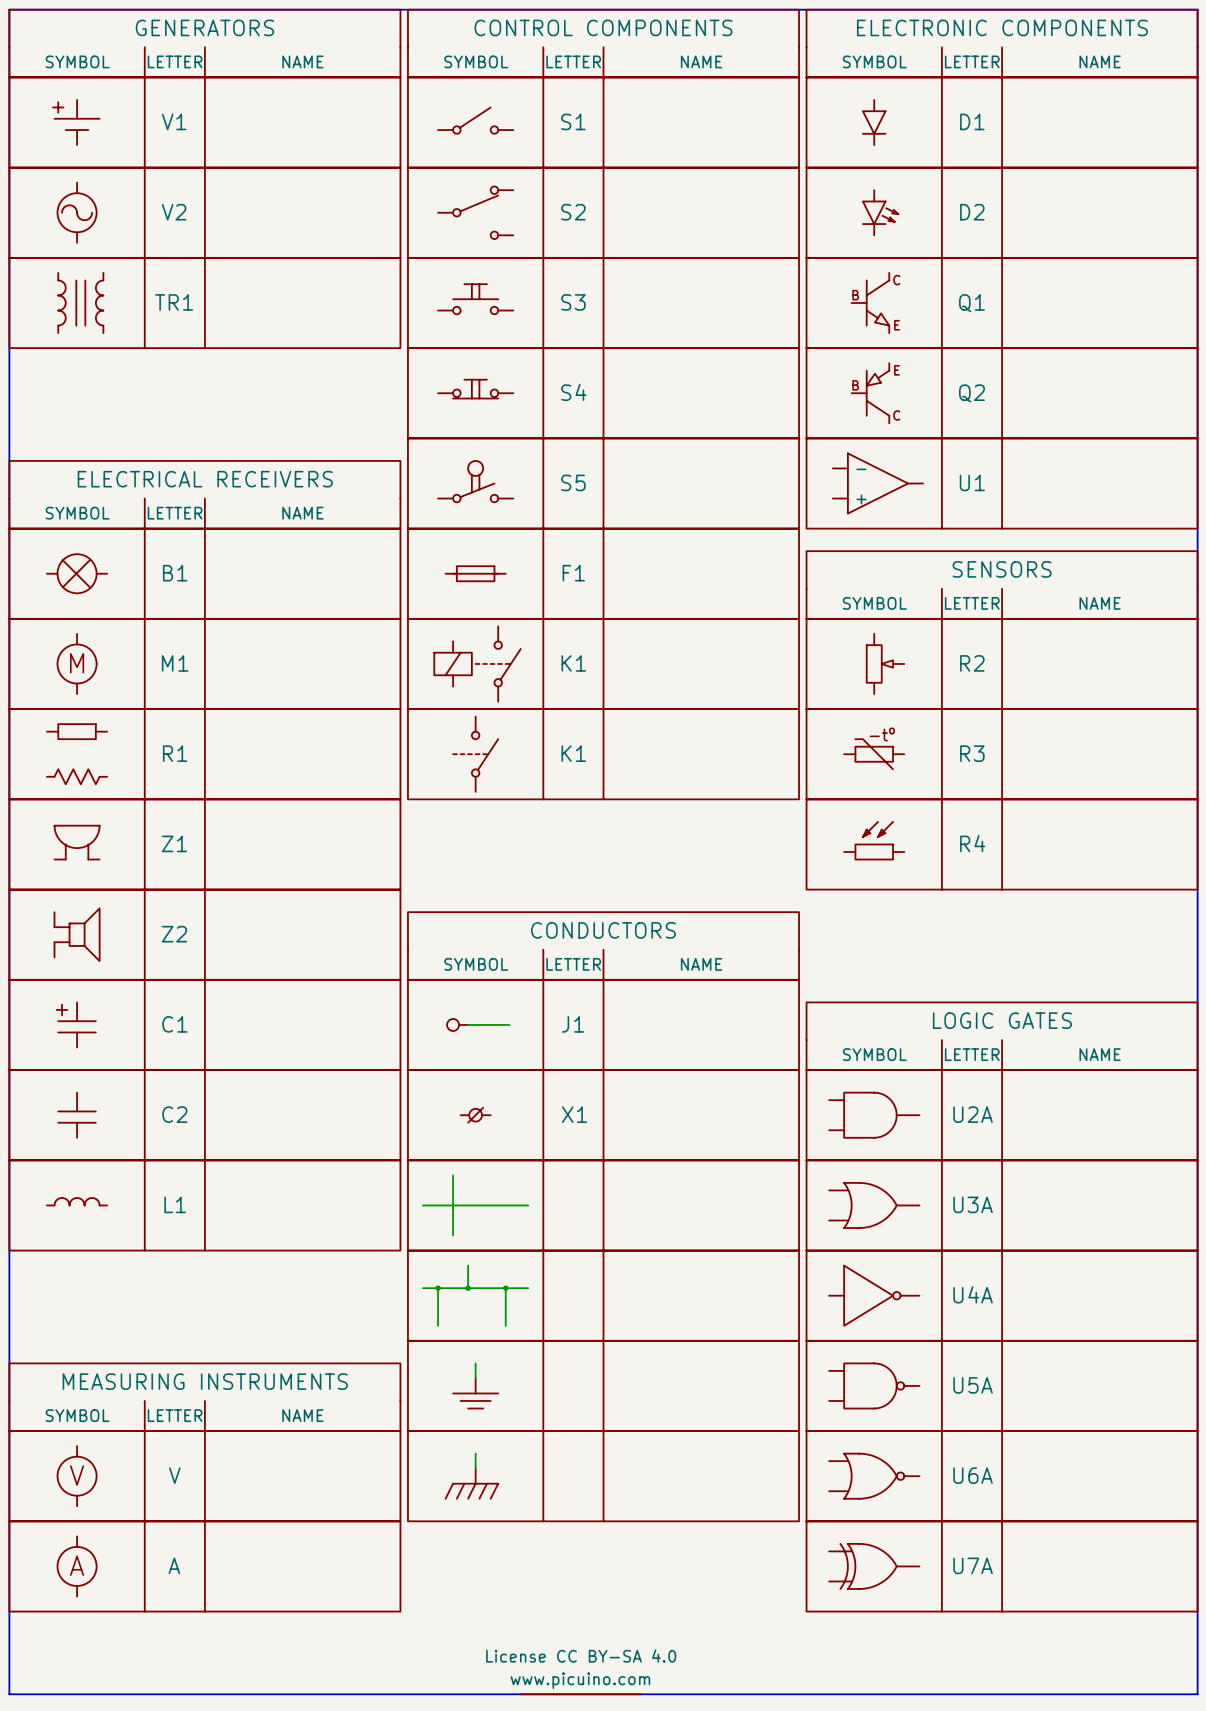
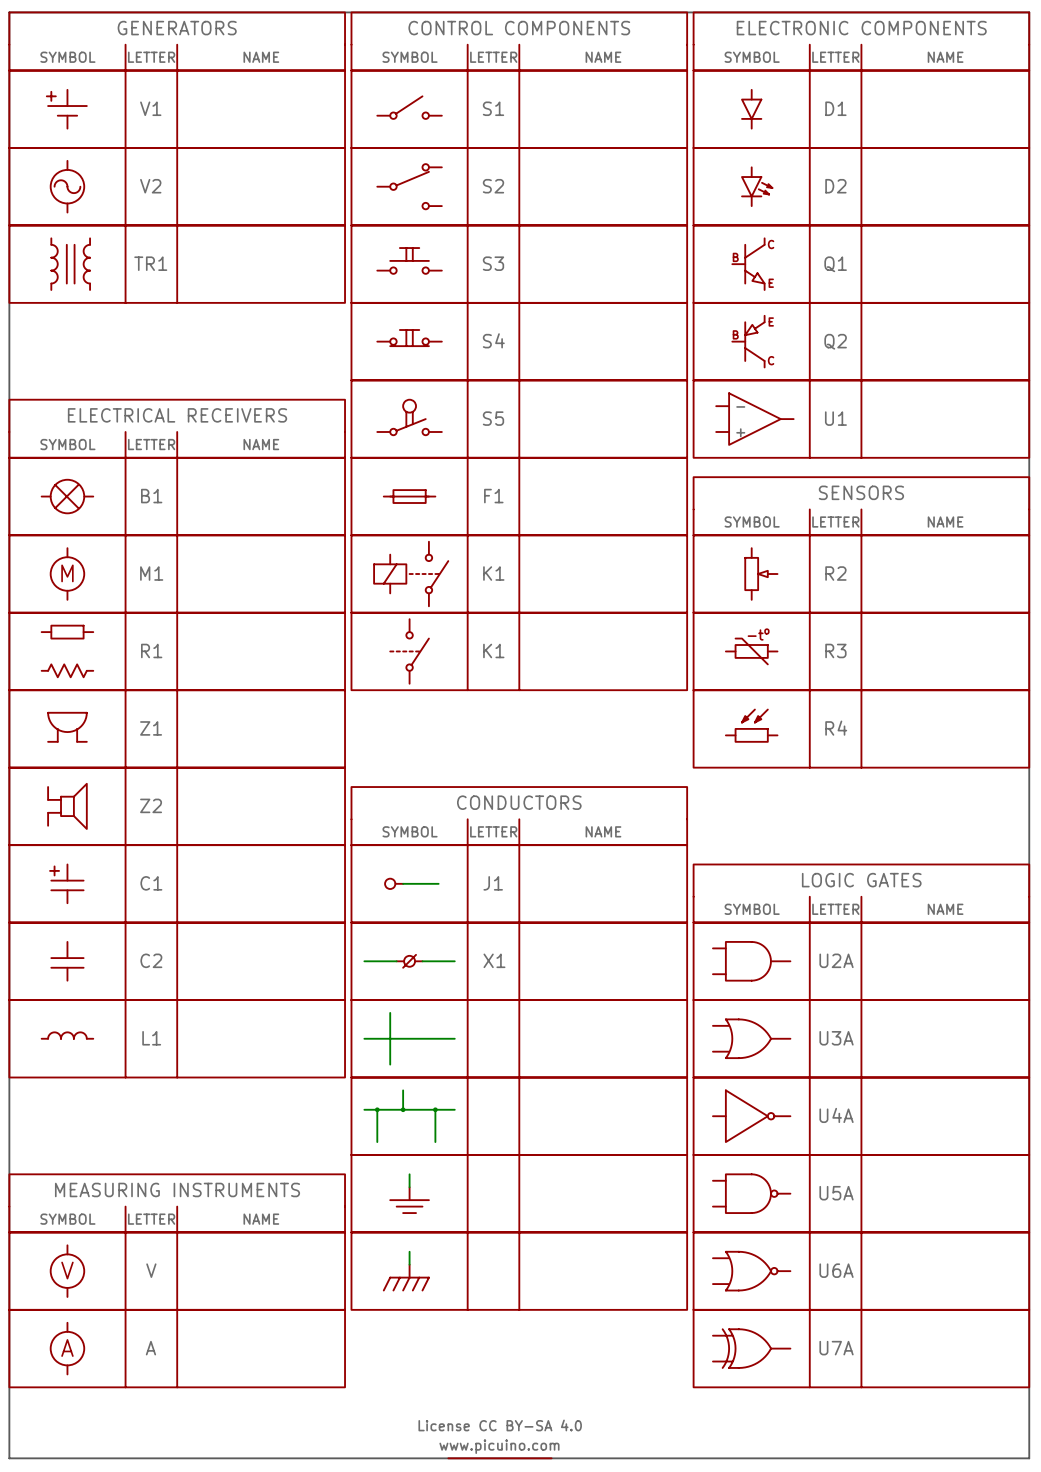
wire: none -> (364, 961) (396, 961)
wire: none -> (422, 961) (454, 961)

